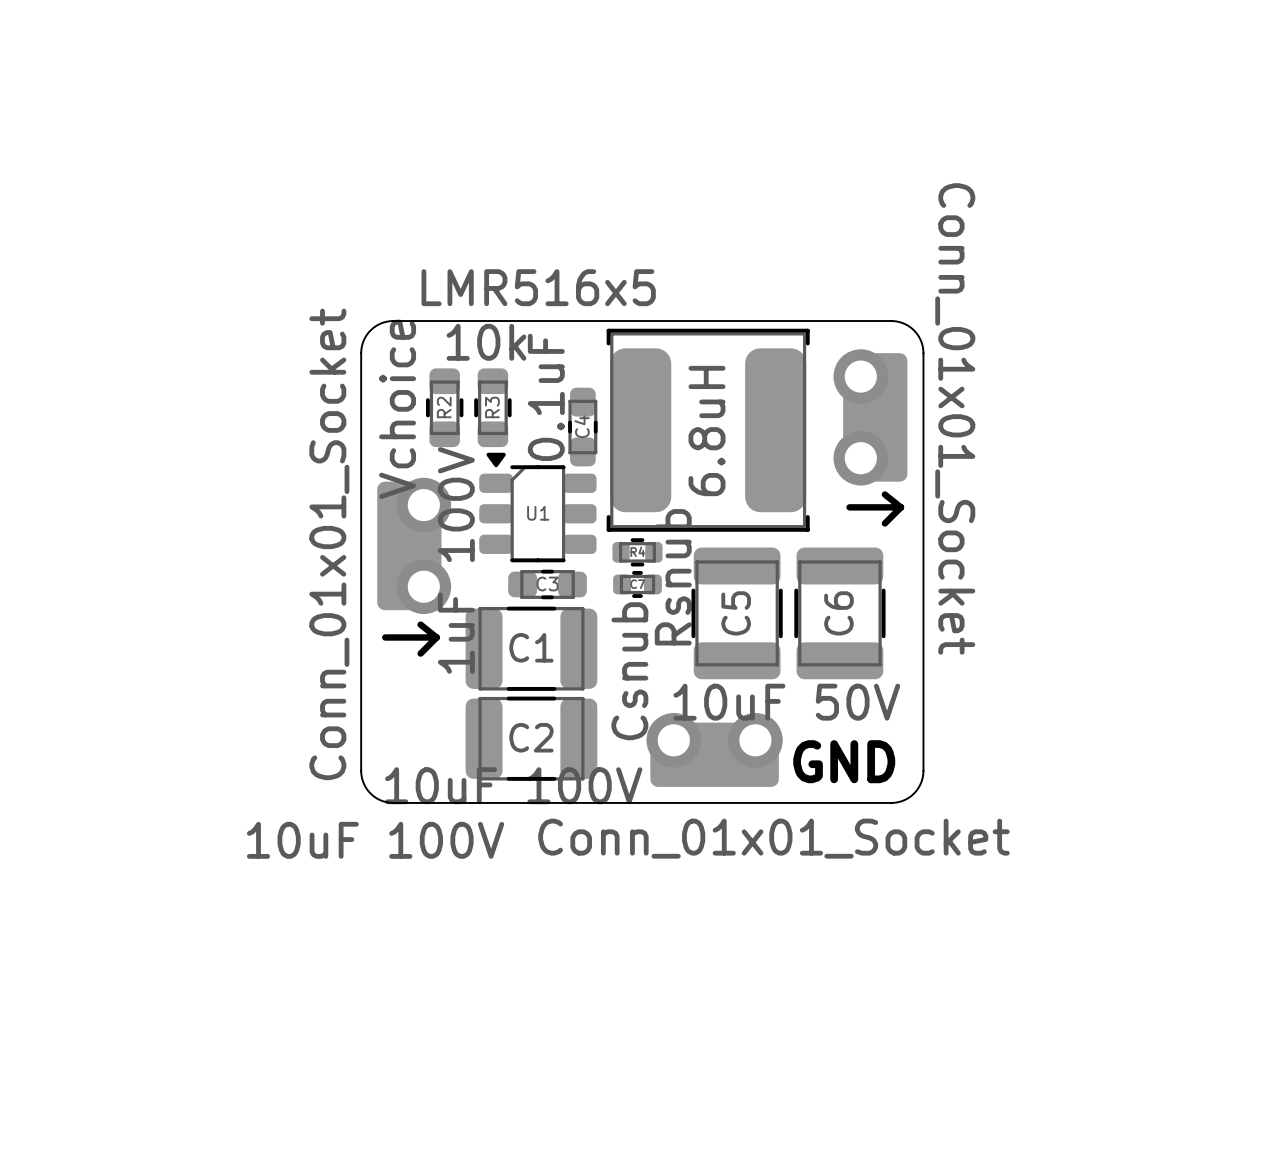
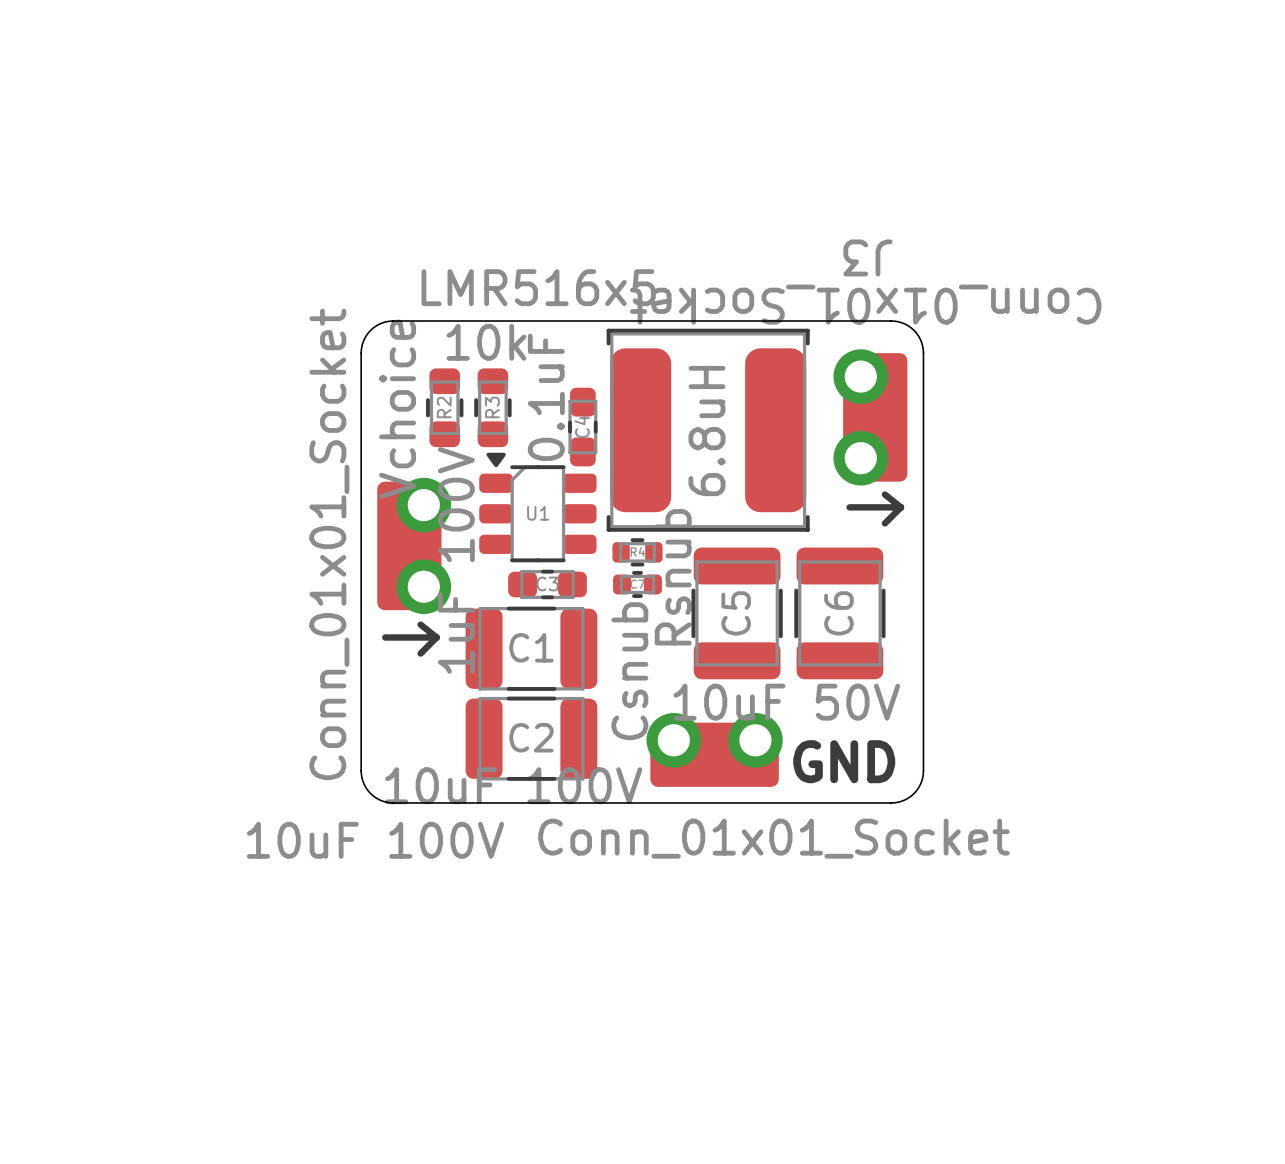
J3 name: none -> J3 (868, 257)
J3 value rotation: 0° (955, 418) -> 90° clockwise (865, 304)

